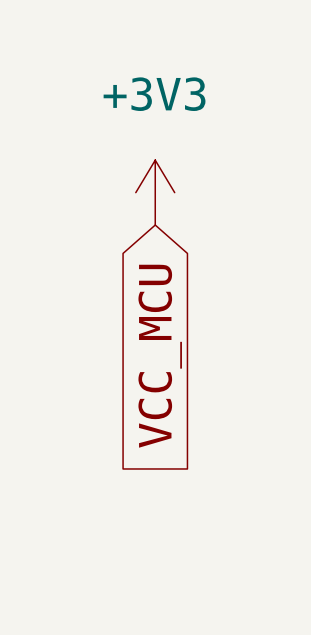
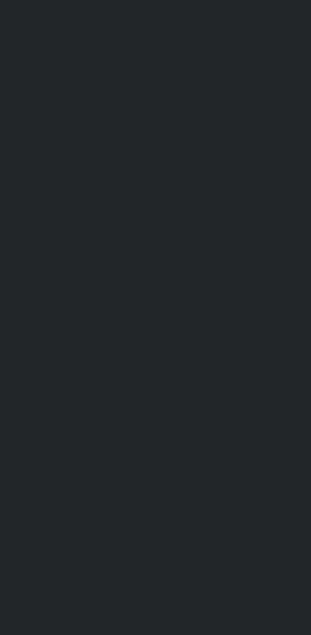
power symbol: +3V3 (155, 192) -> none
global label: VCC_MCU (160, 356) -> none

